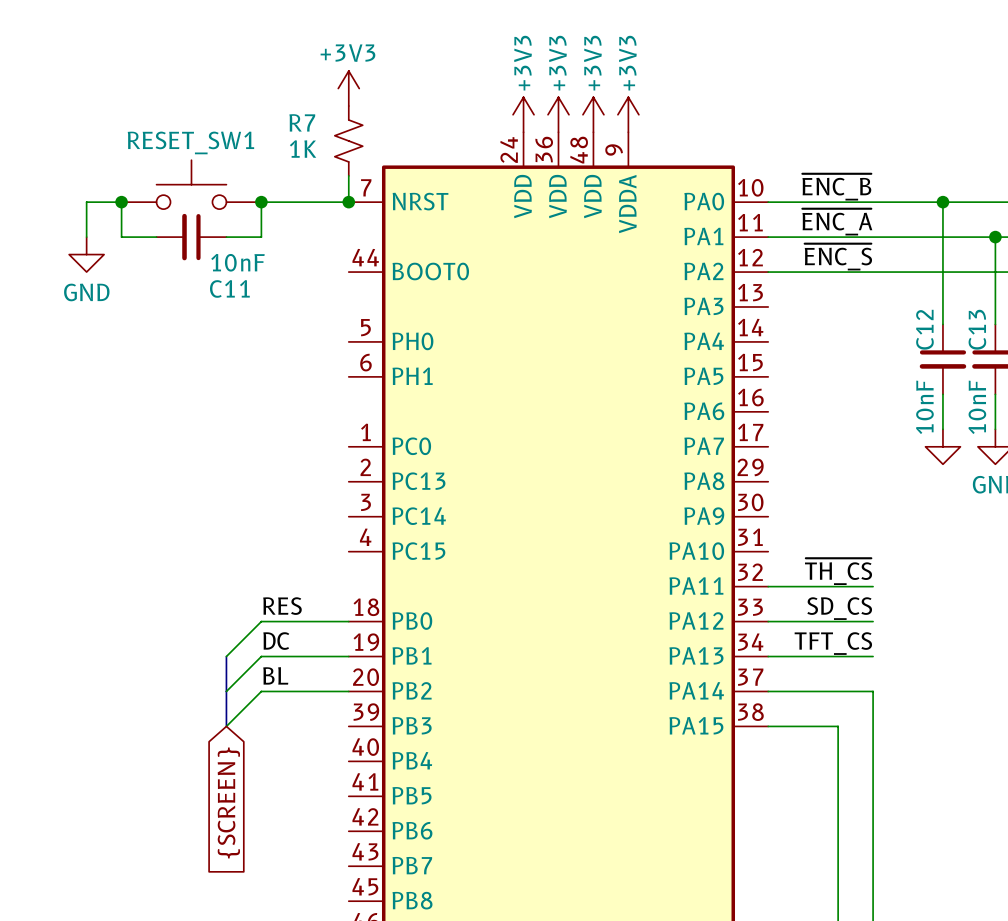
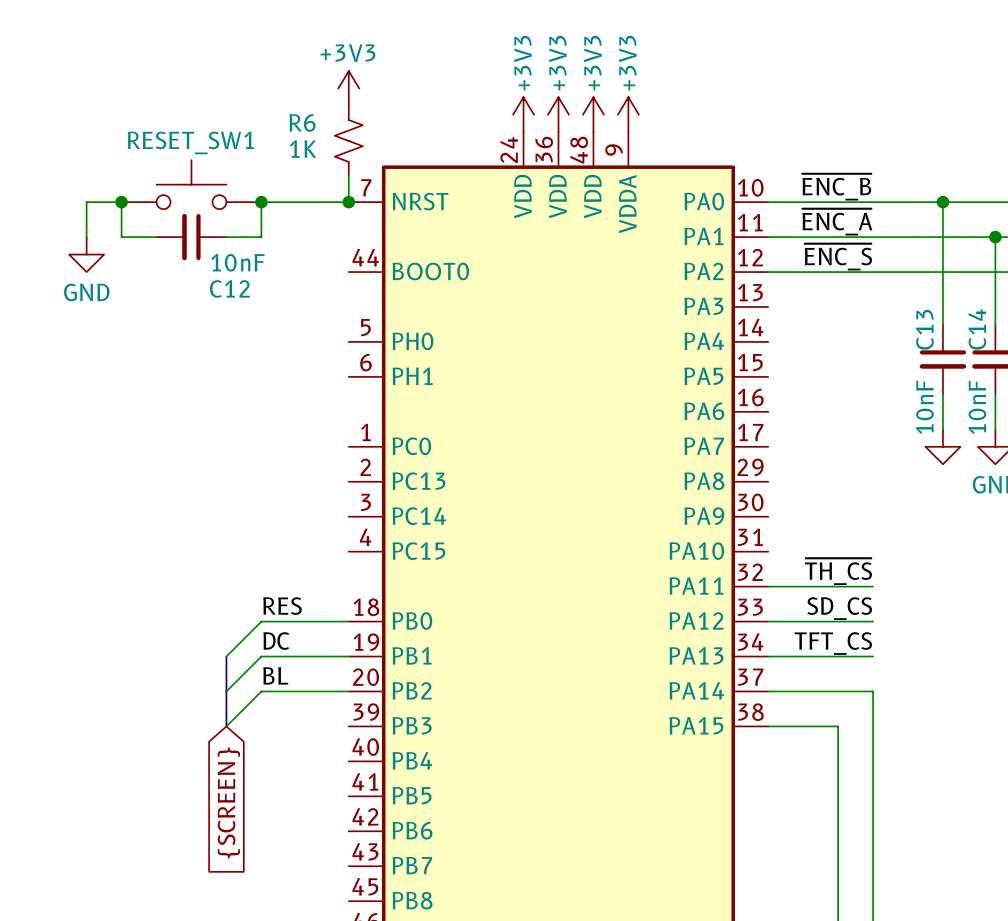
R7 name: R7 (302, 122) -> R6 (302, 122)
C11 name: C11 (229, 288) -> C12 (229, 288)
C12 name: C12 (924, 329) -> C13 (924, 329)
C13 name: C13 (977, 329) -> C14 (977, 329)

